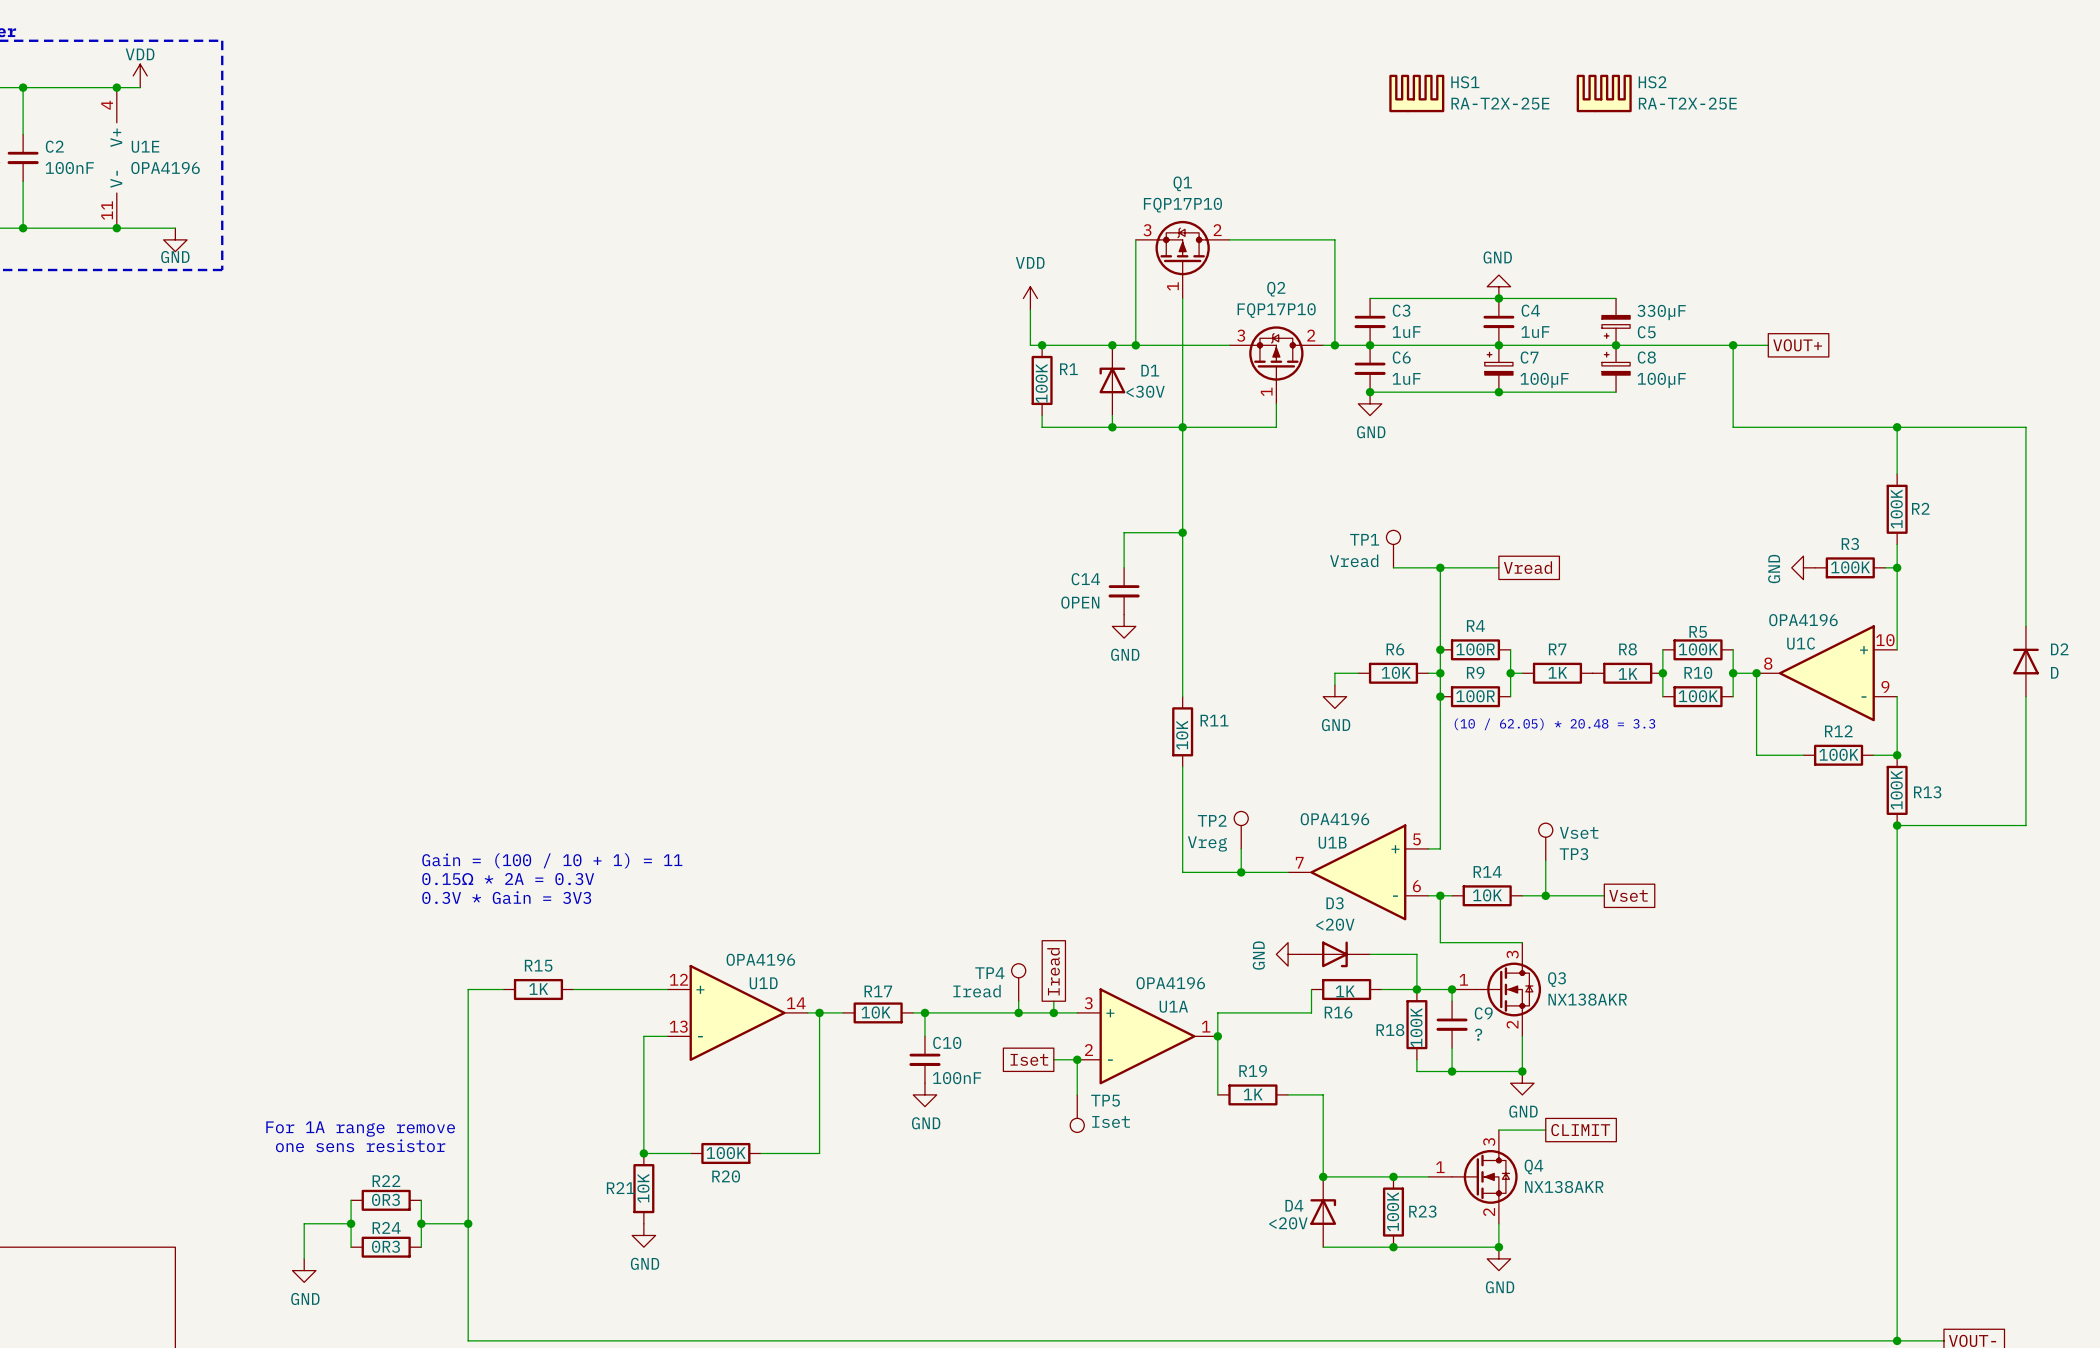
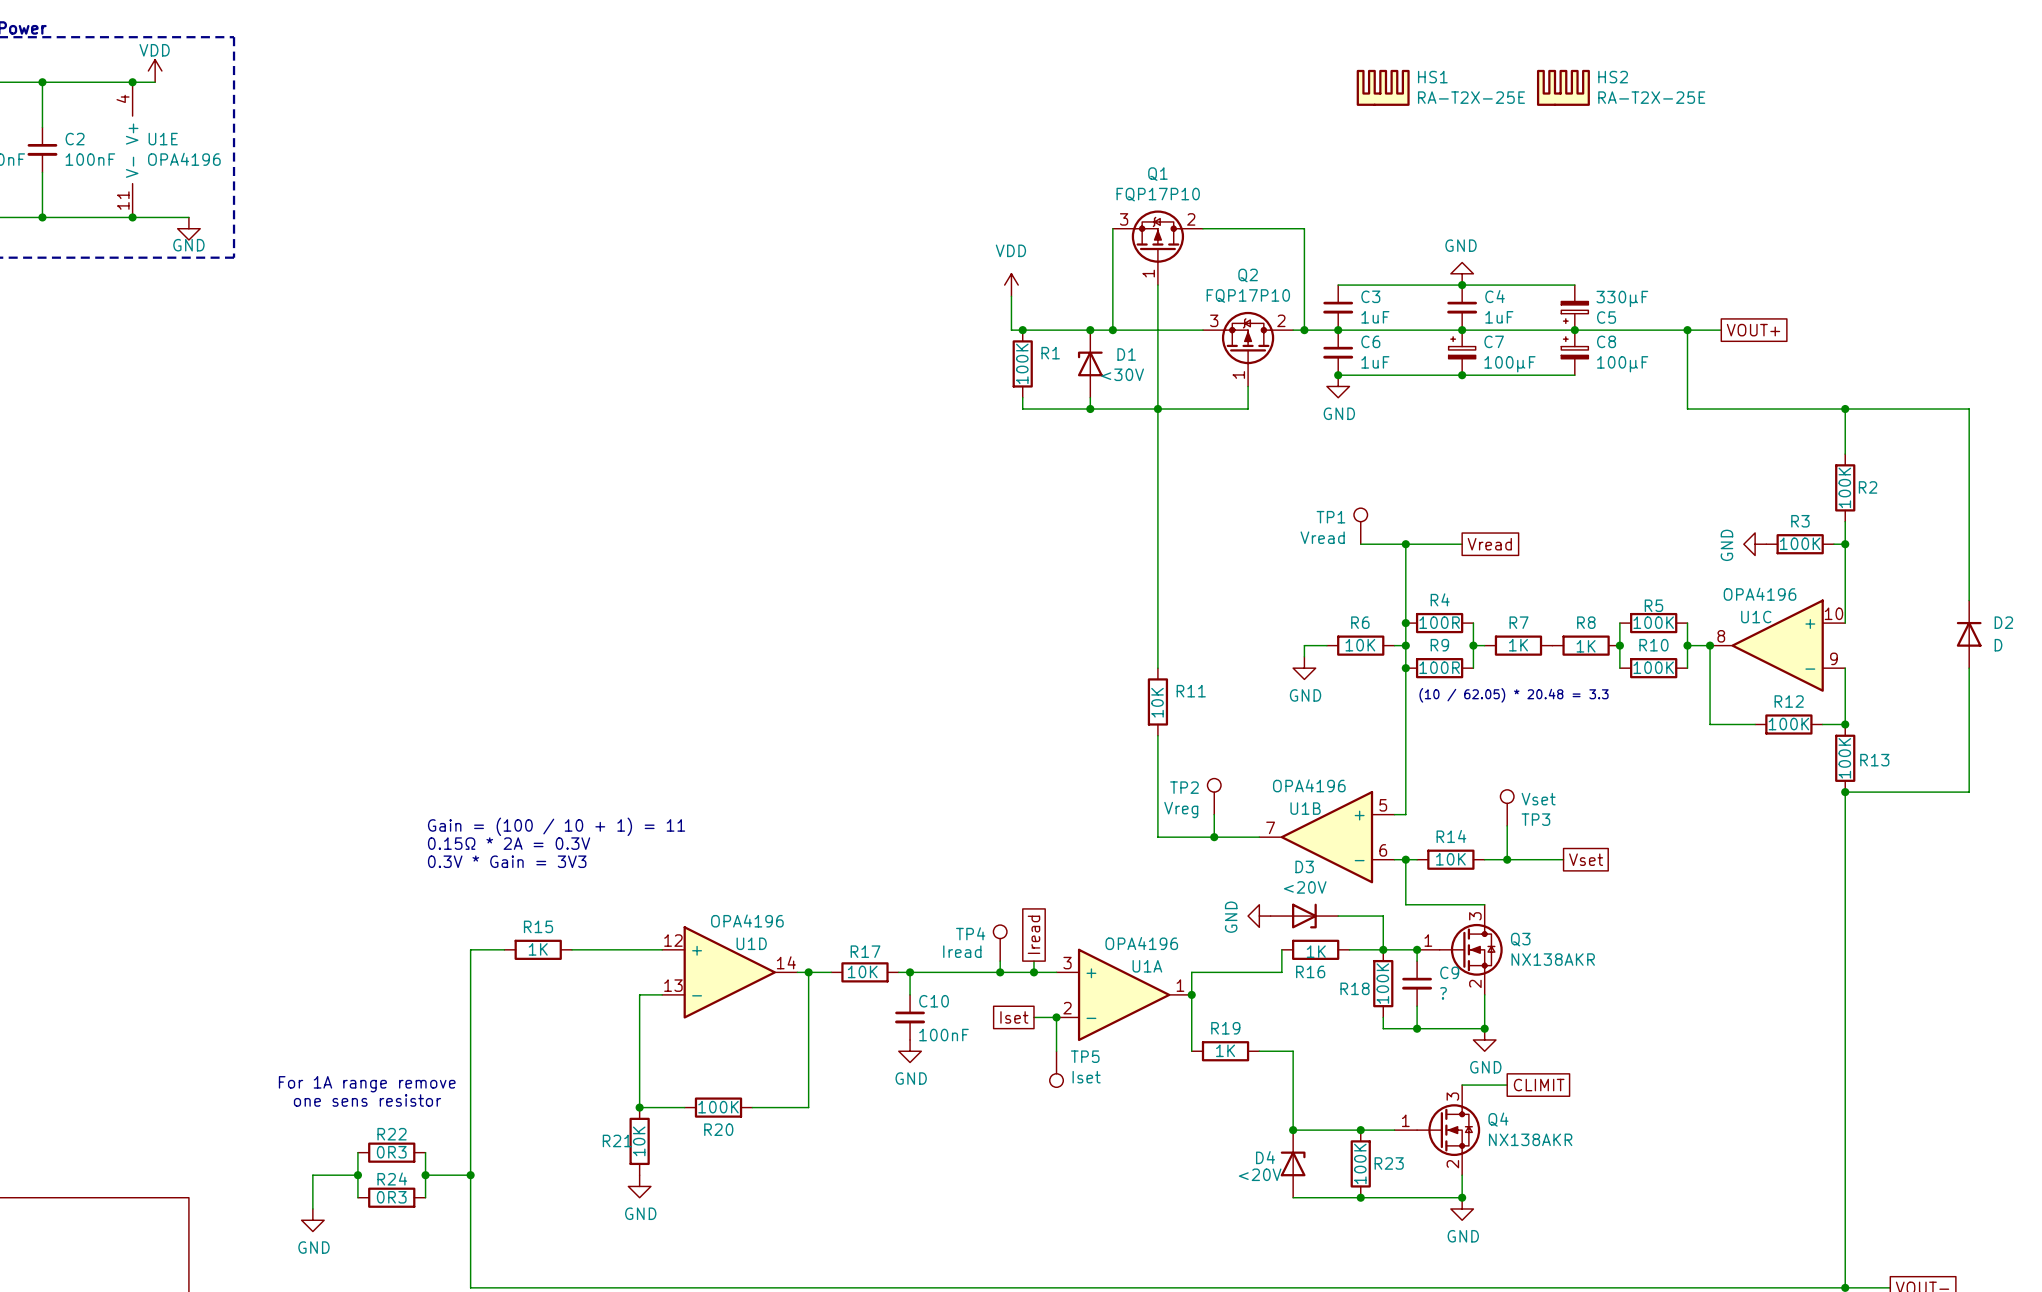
wire: (1182, 532) (1124, 532) (1124, 567) -> none
junction: (1182, 532) -> none
C14: OPEN (1124, 591) -> none
power symbol: GND (1124, 626) -> none

